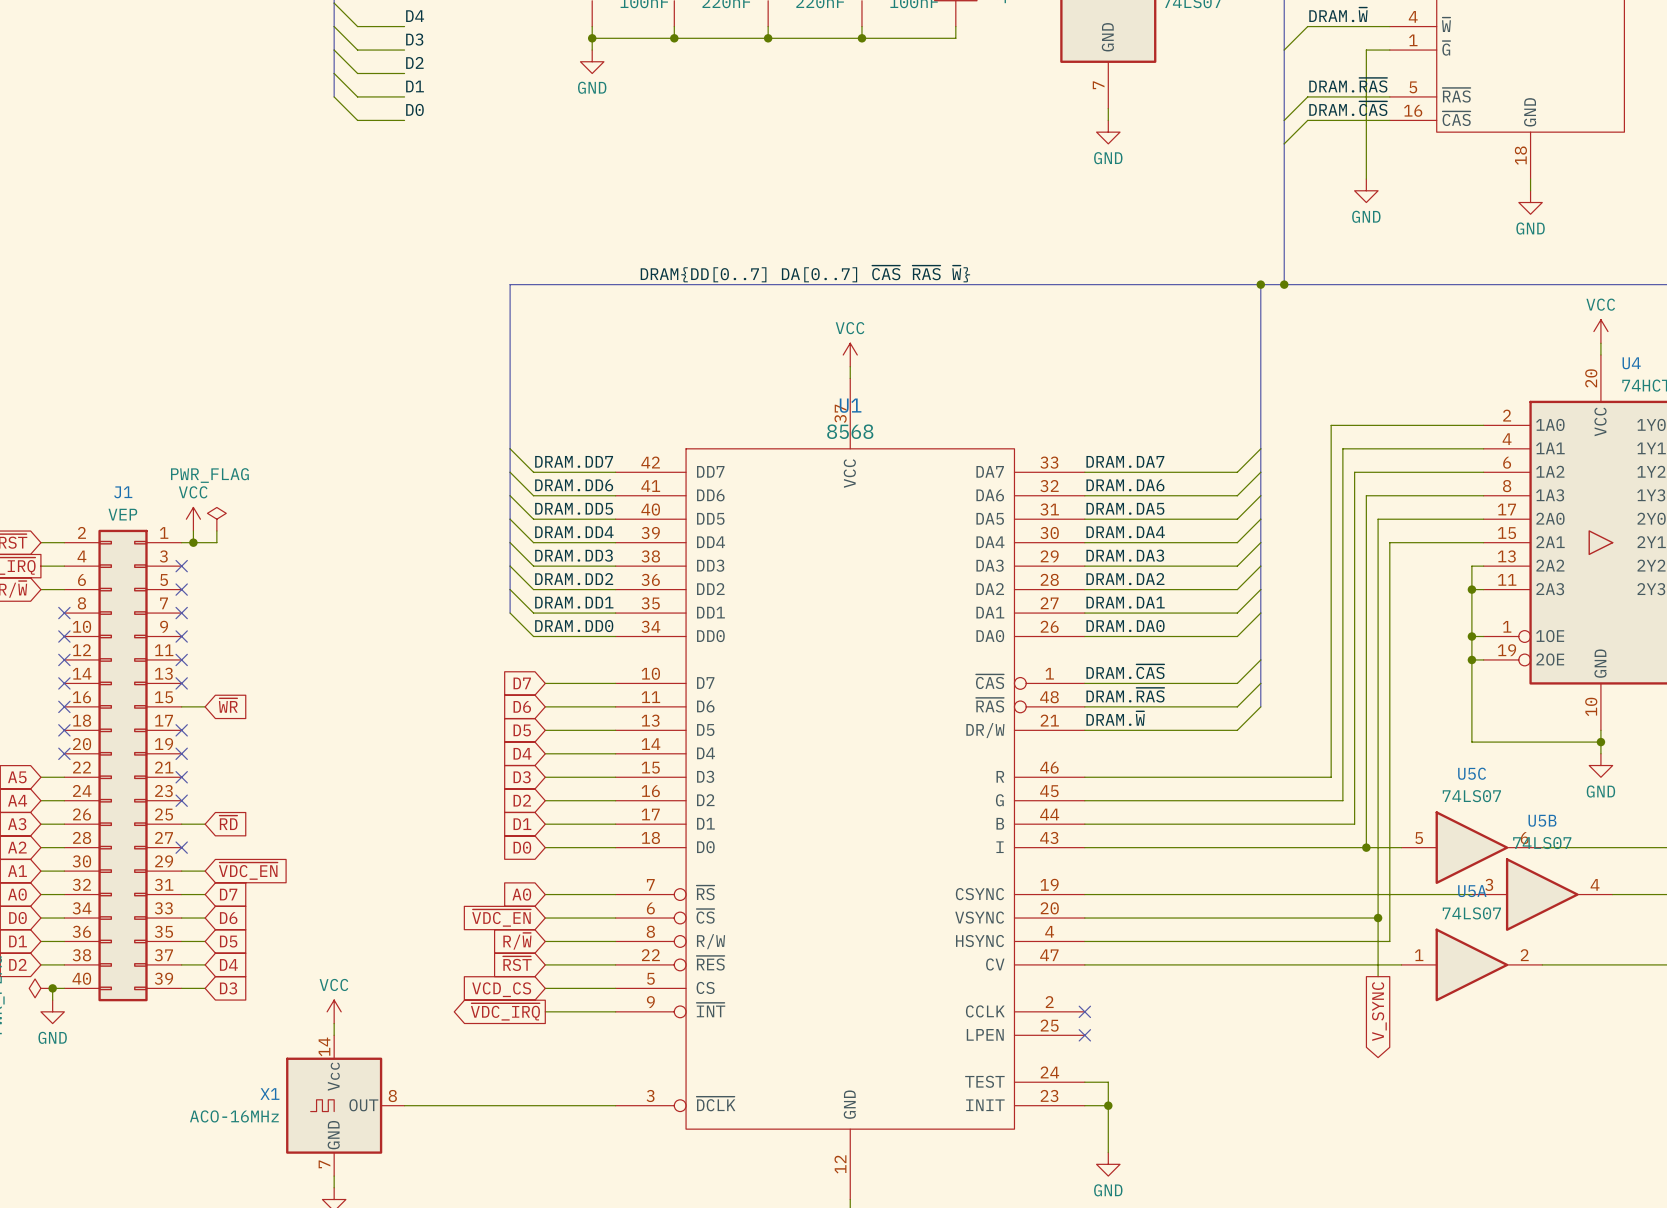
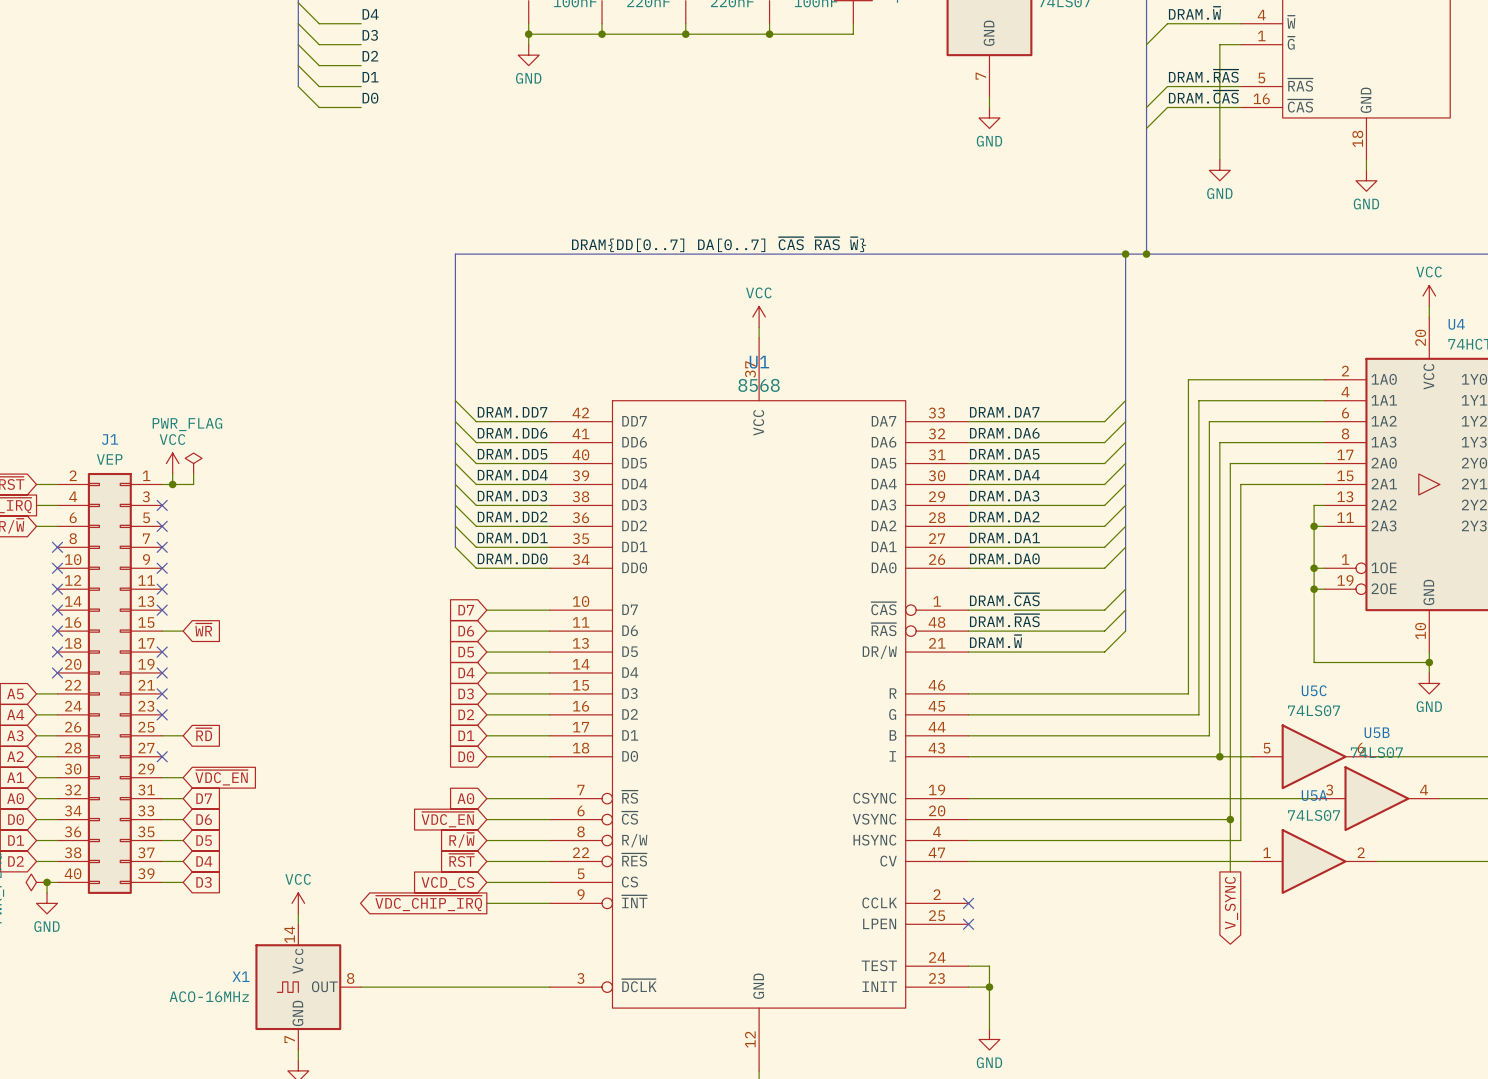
global label: ~{VDC_IRQ} (505, 1011) -> ~{VDC_CHIP_IRQ} (428, 903)

